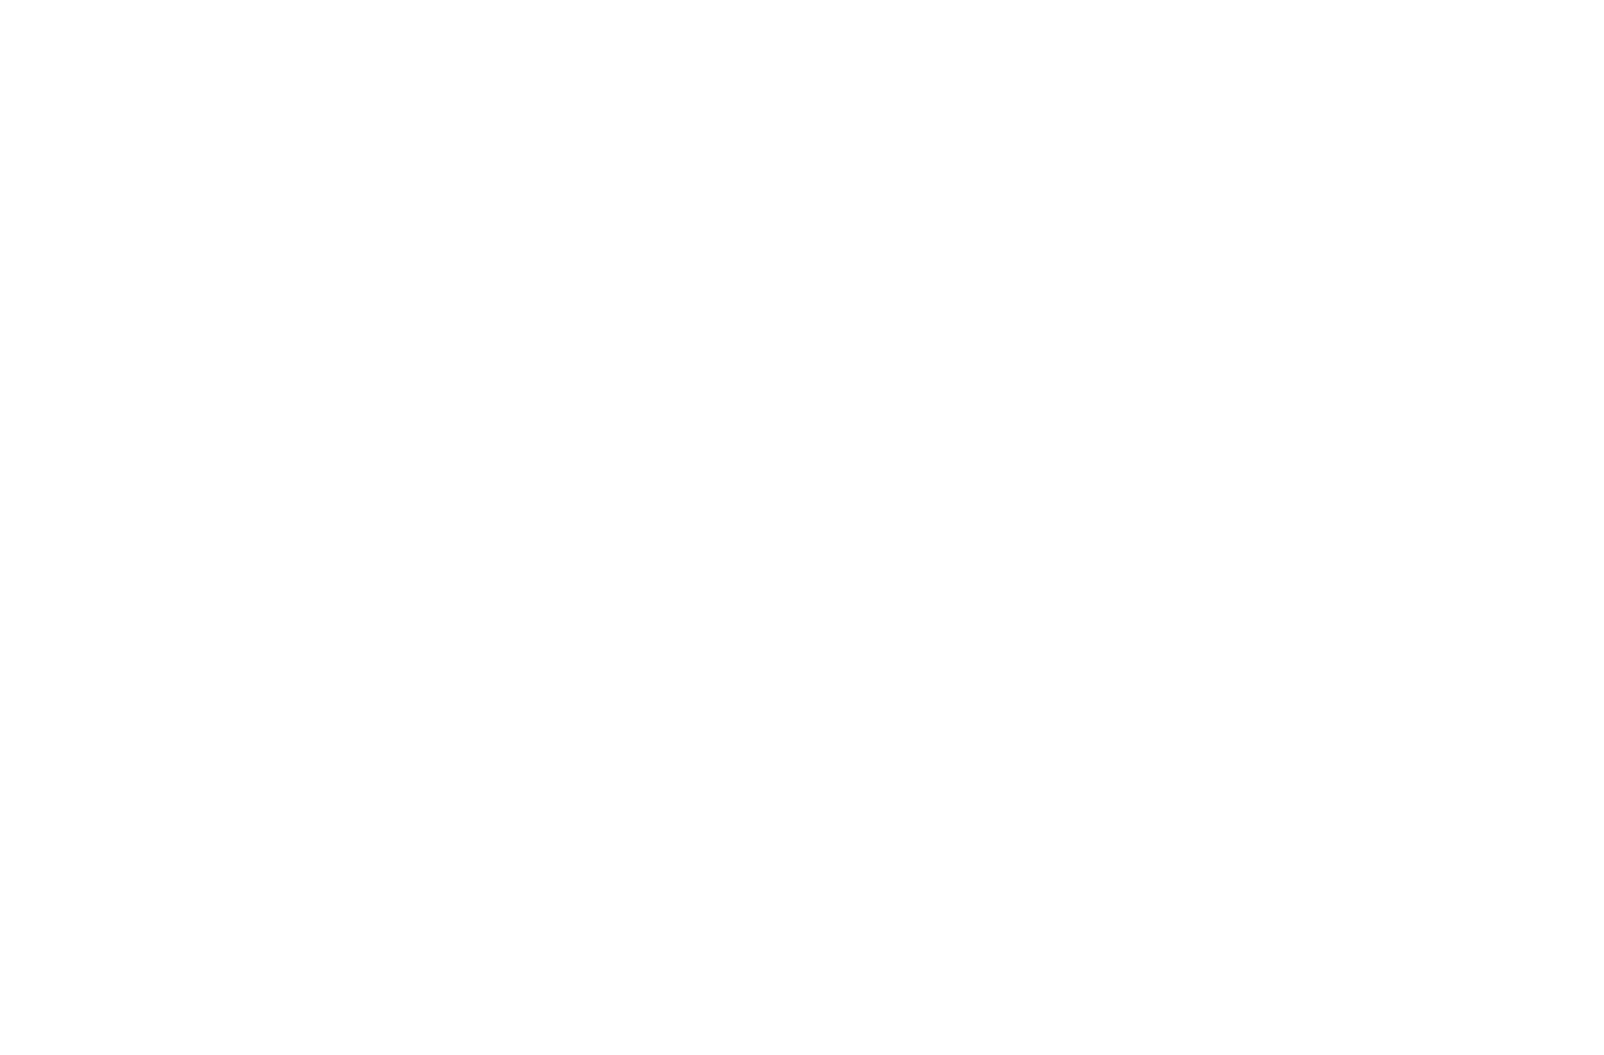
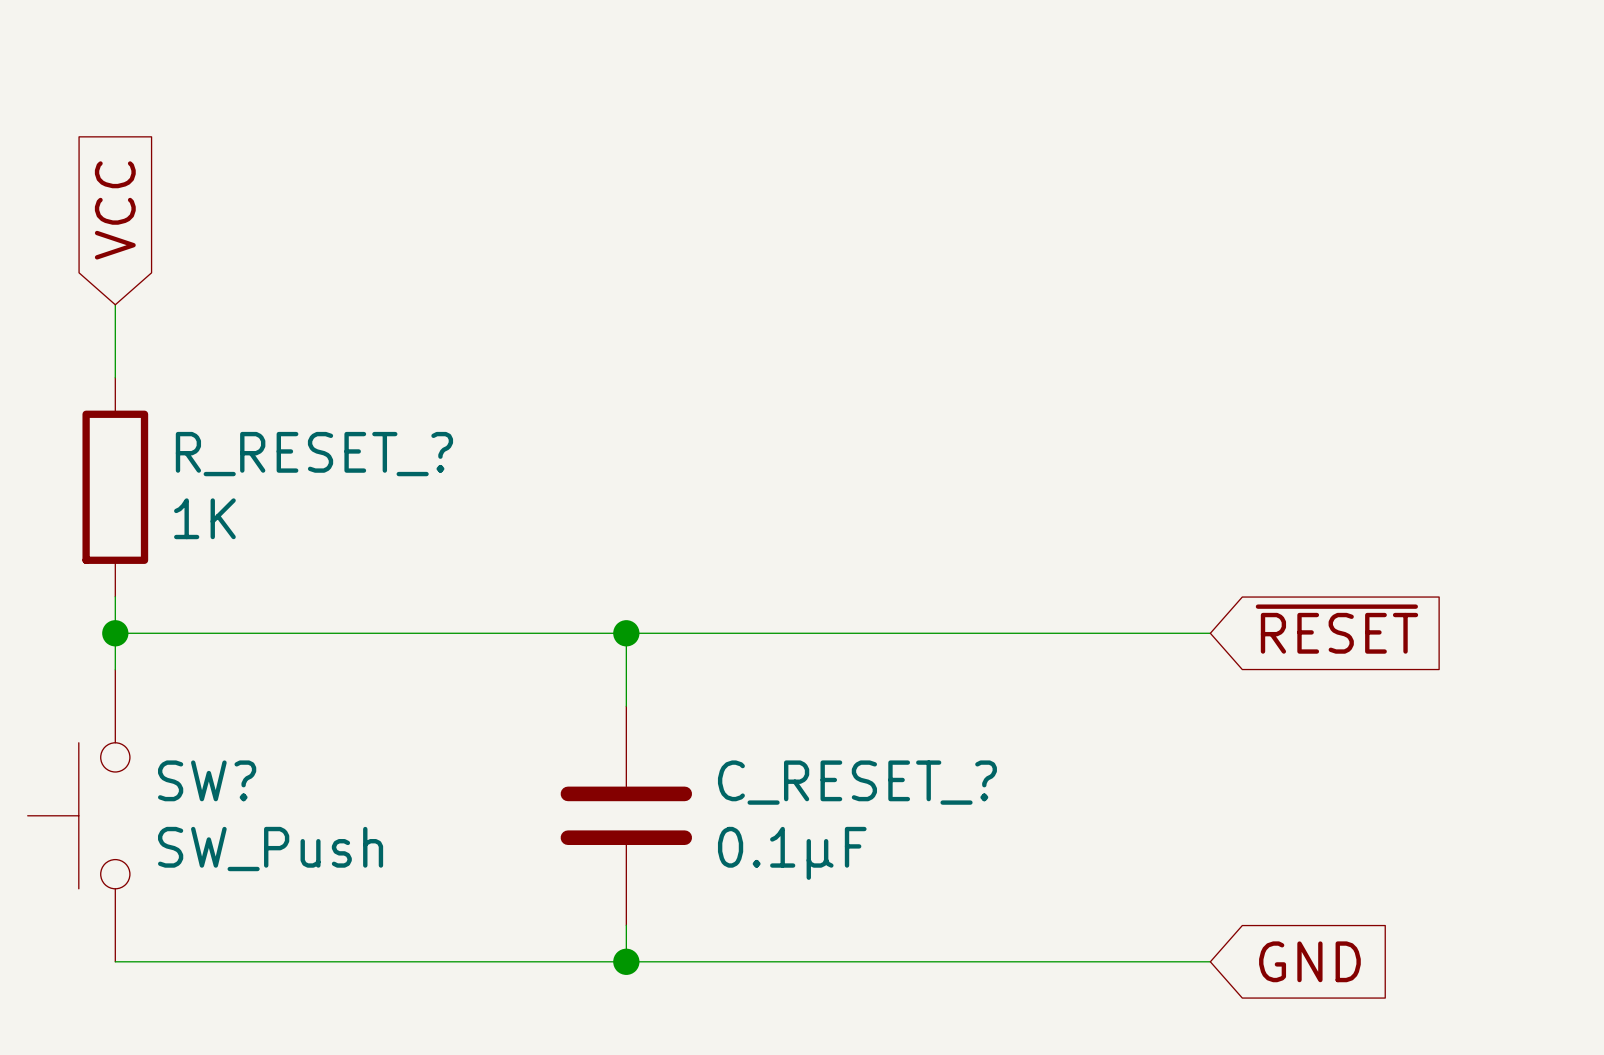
global label: none -> VCC (115, 210)
wire: none -> (115, 304) (115, 377)
R_RESET_?: none -> 1K (115, 487)
wire: none -> (115, 596) (115, 669)
global label: none -> ~{RESET} (1336, 629)
wire: none -> (115, 633) (1210, 633)
junction: none -> (115, 633)
wire: none -> (626, 633) (626, 706)
junction: none -> (626, 633)
SW?: none -> SW_Push (78, 815)
C_RESET_?: none -> 0.1µF (626, 815)
wire: none -> (626, 925) (626, 961)
wire: none -> (115, 961) (1210, 961)
junction: none -> (626, 961)
global label: none -> GND (1309, 961)

